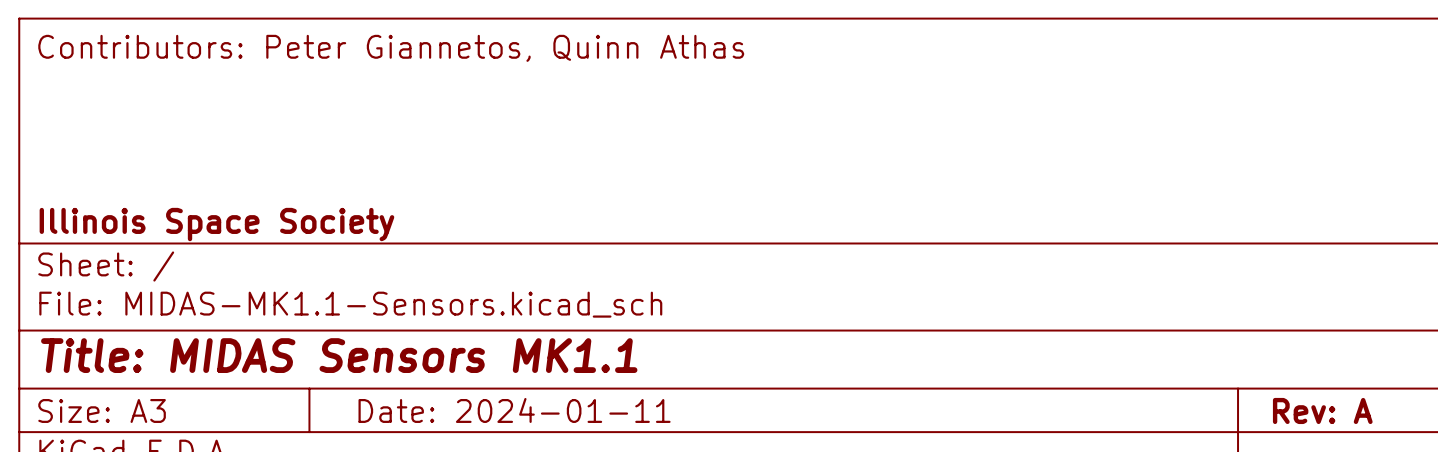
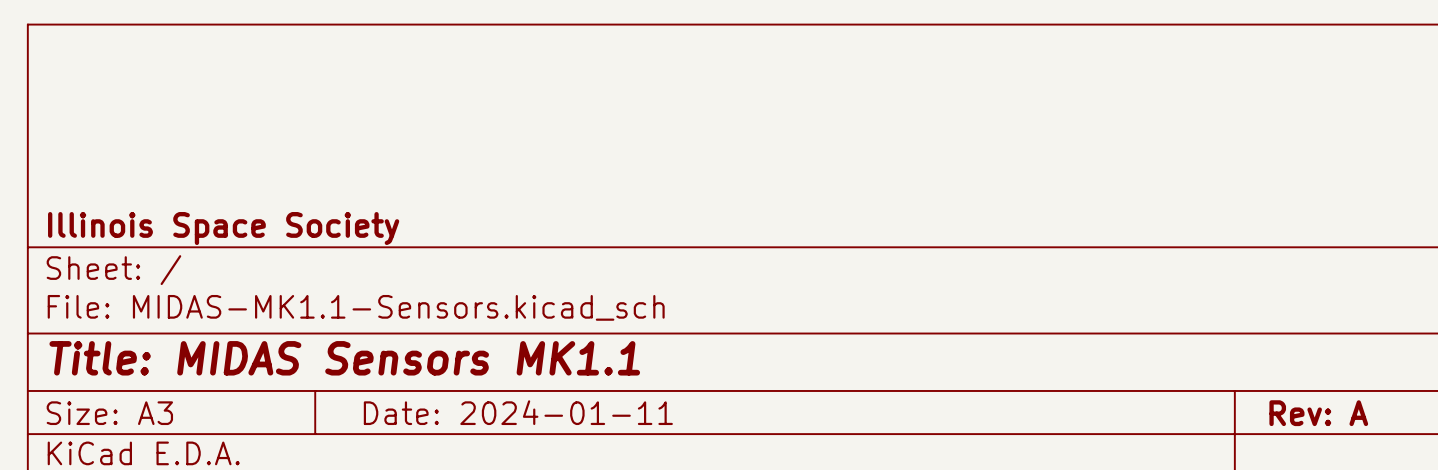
title block: Contributors: Peter Giannetos, Quinn Athas (391, 48) -> none

